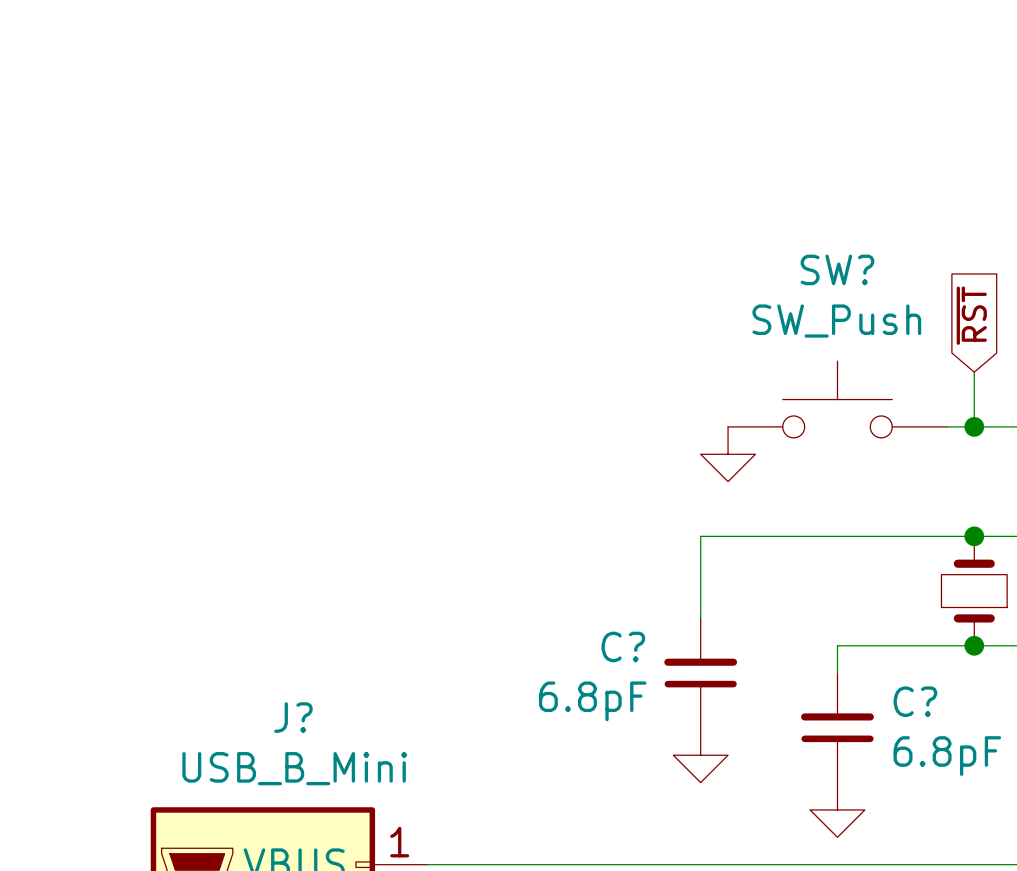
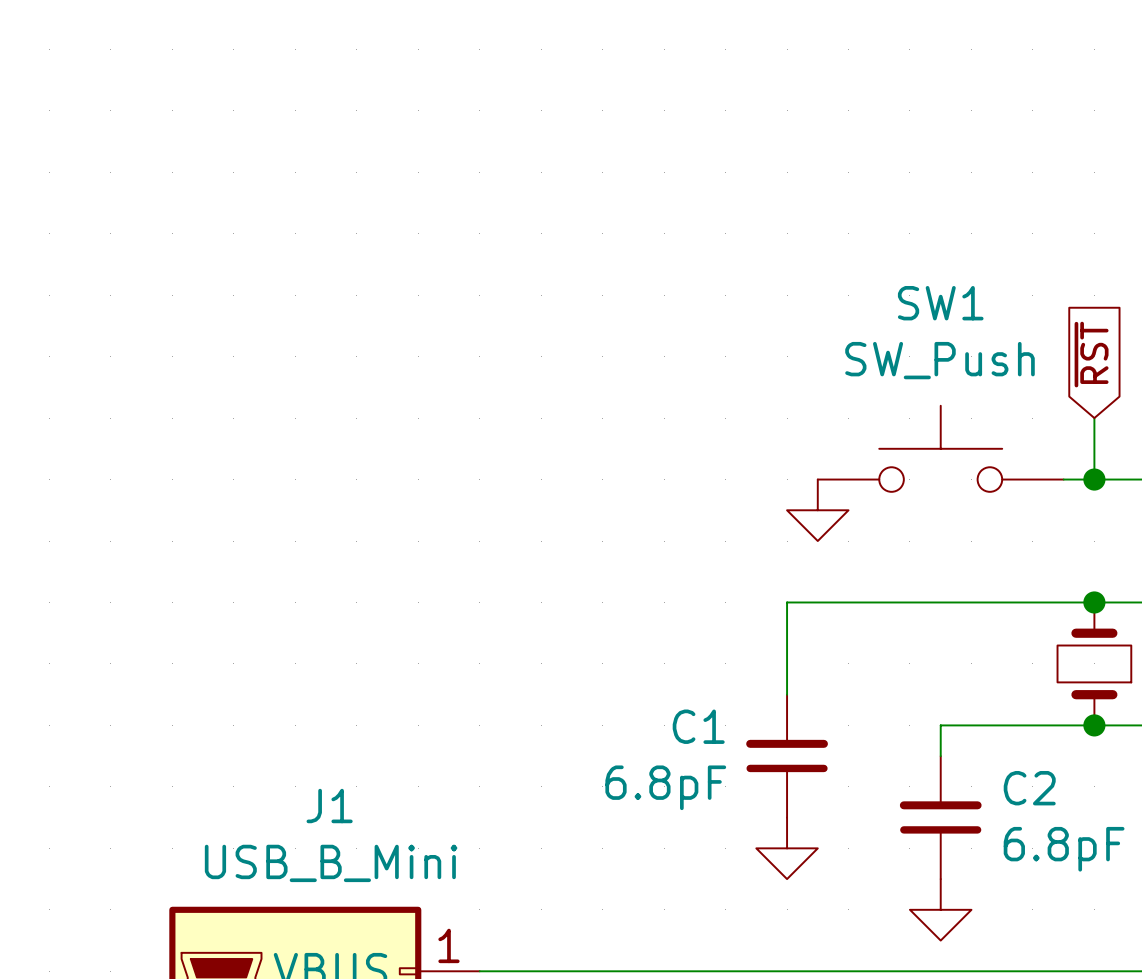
SW? name: SW? (837, 269) -> SW1 (940, 303)
C? name: C? (623, 646) -> C1 (698, 726)
C? name: C? (915, 701) -> C2 (1029, 788)
J? name: J? (293, 717) -> J1 (329, 806)

